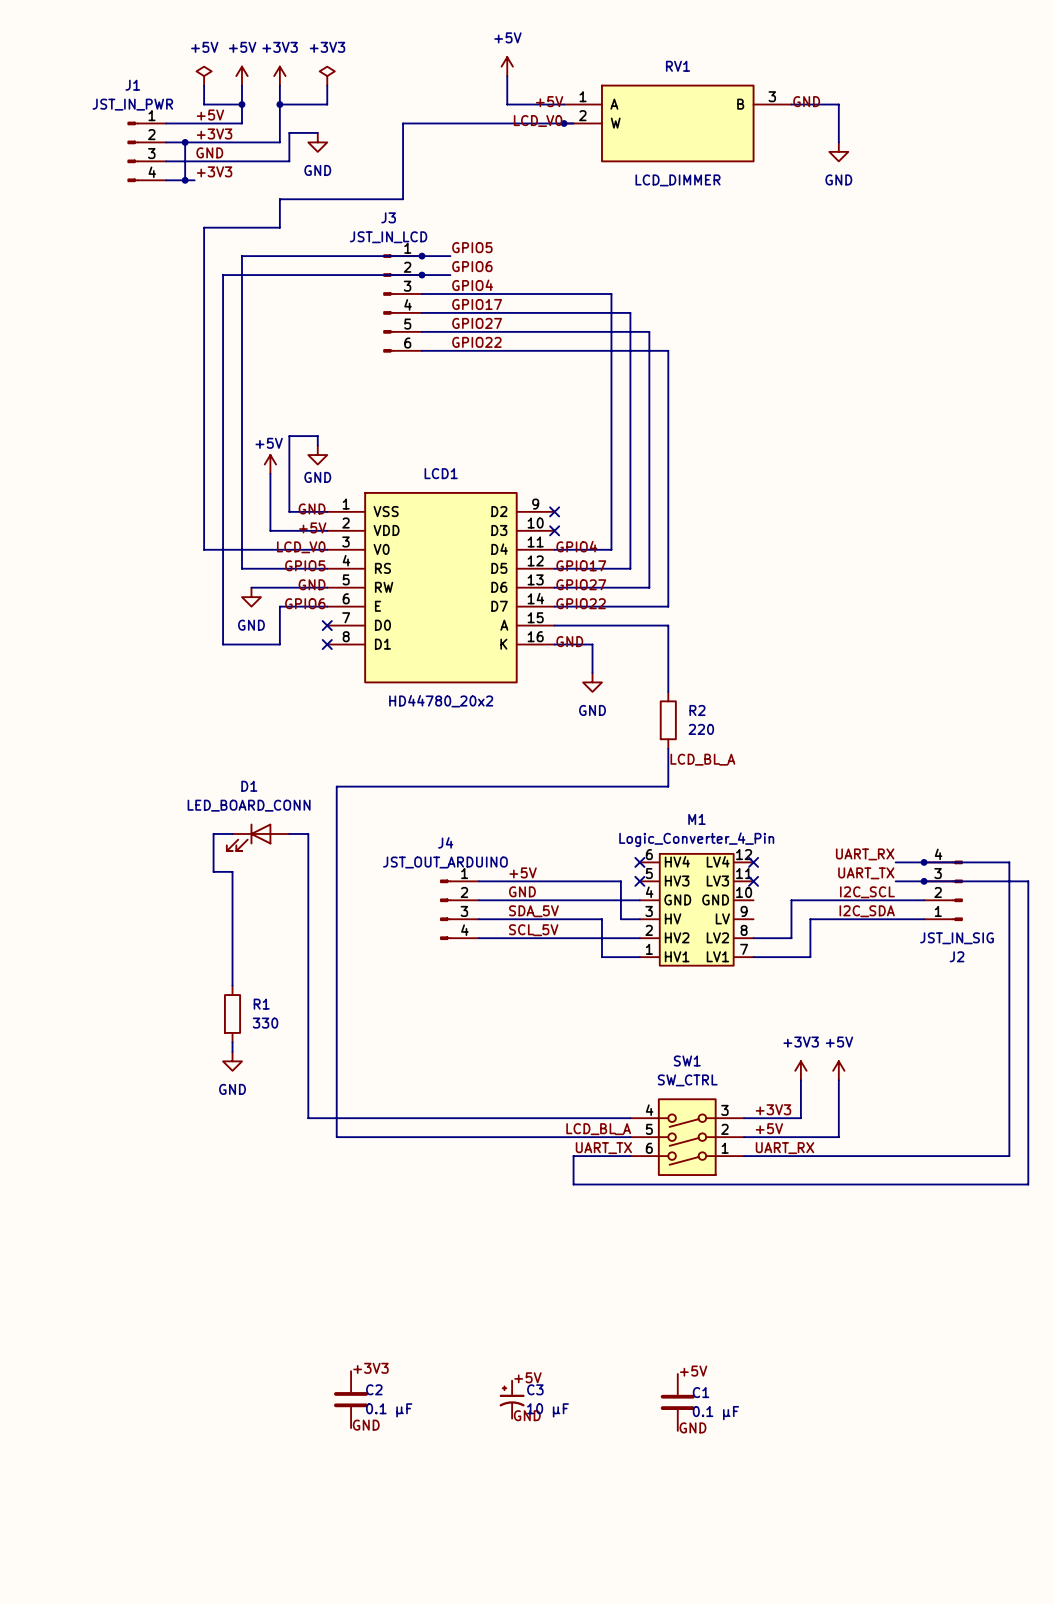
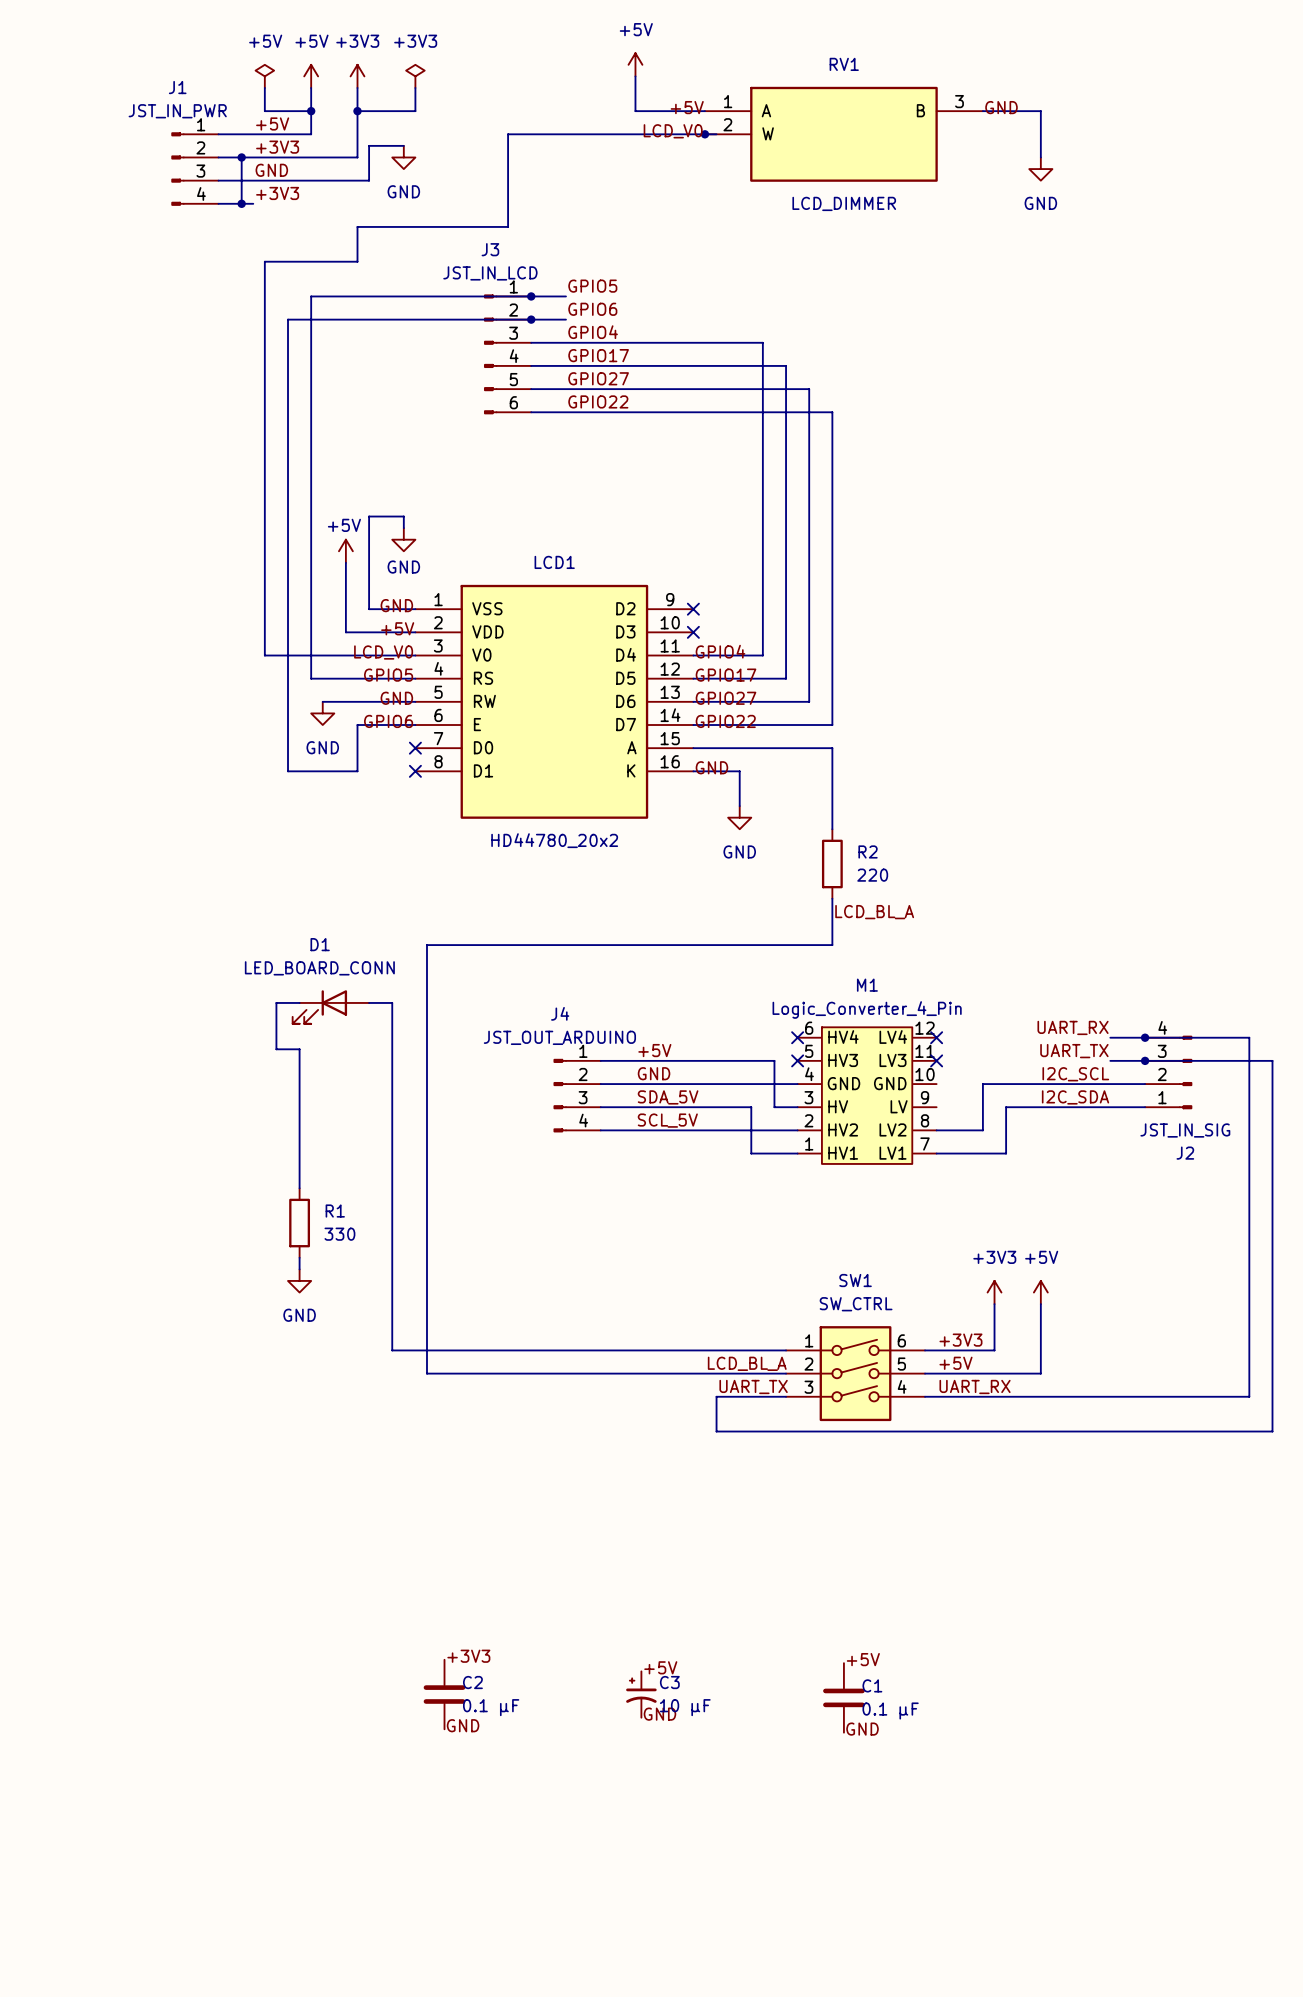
SW1 rotation: 0° (687, 1137) -> 180° (855, 1373)

